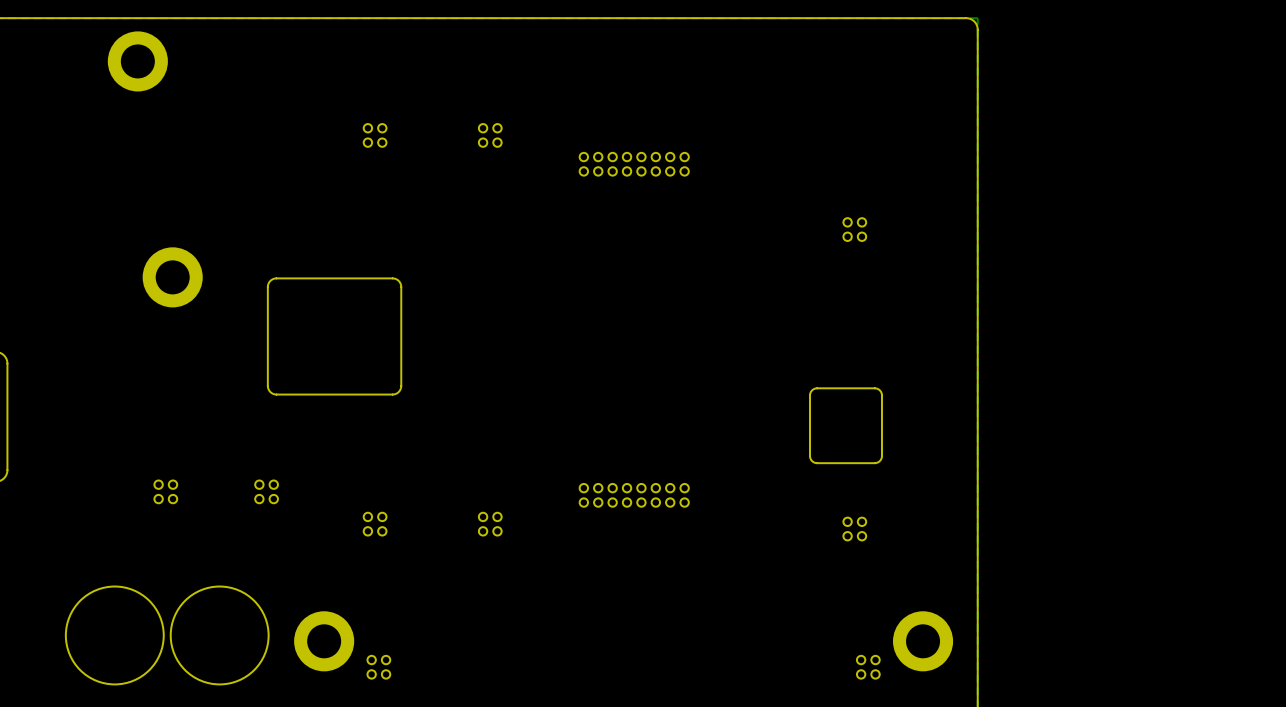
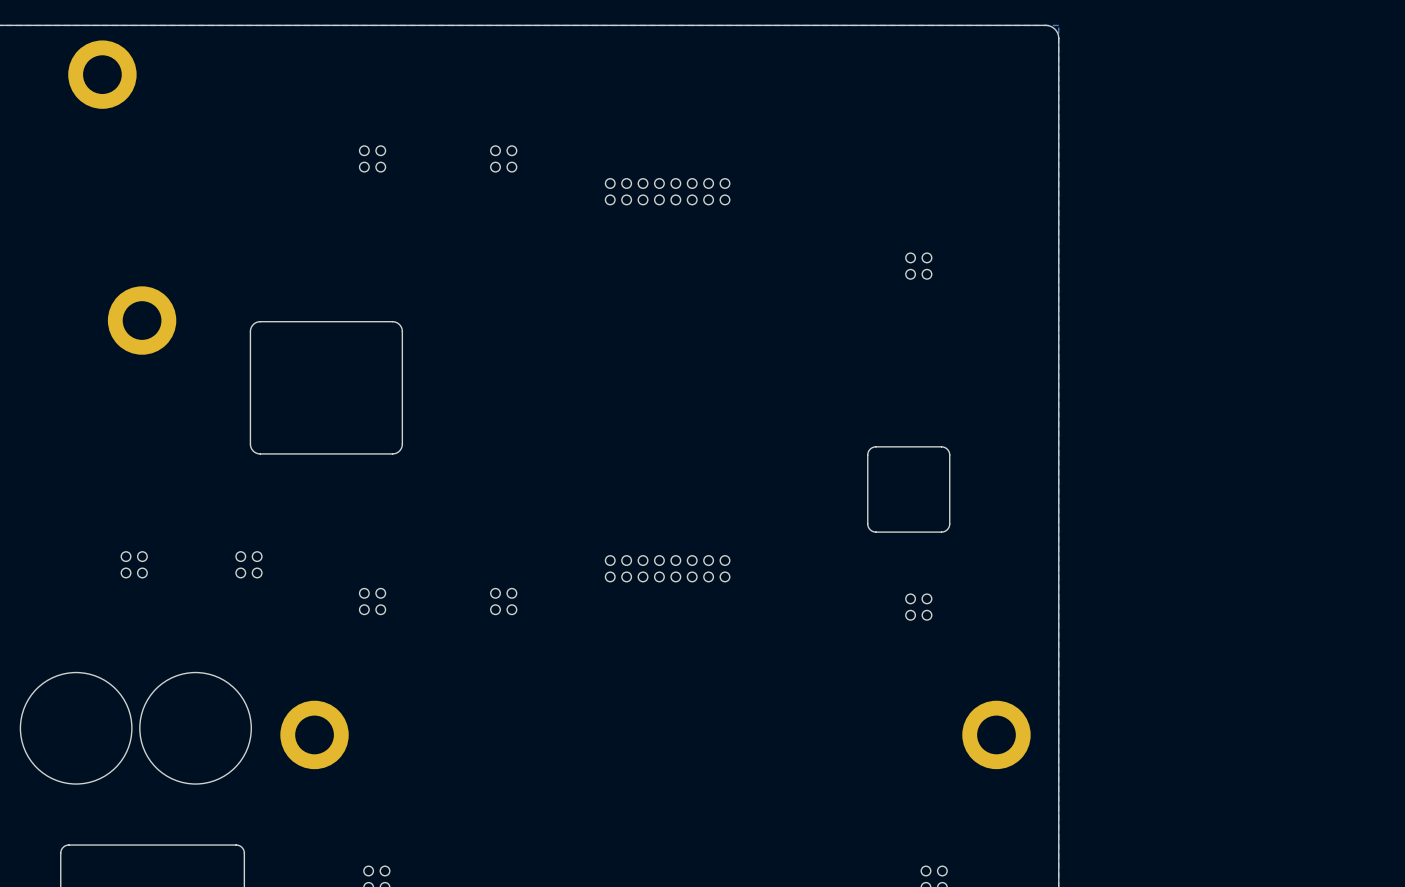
part: (378, 667) -> none
part: (868, 667) -> none

